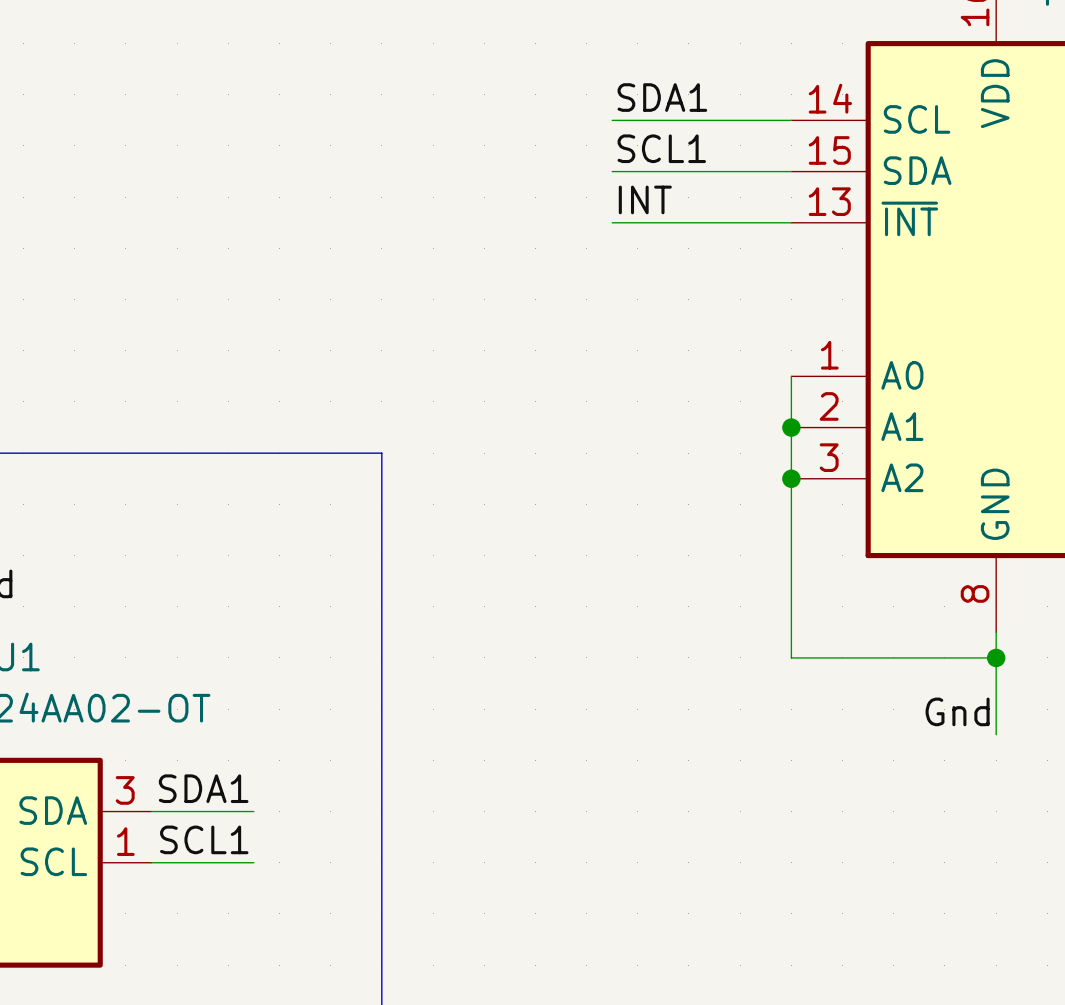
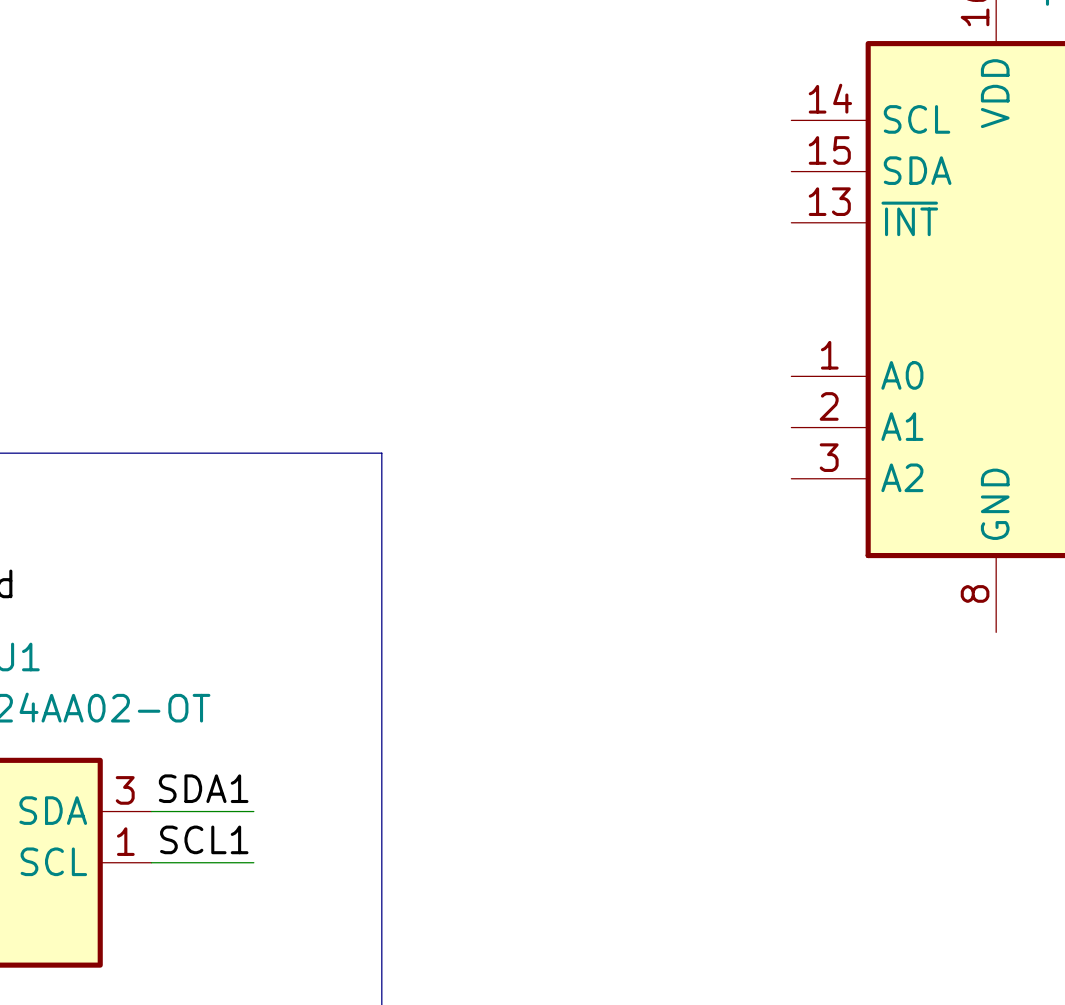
label: SDA1 (662, 97) -> none
wire: (612, 120) (791, 120) -> none
label: SCL1 (661, 148) -> none
wire: (612, 171) (791, 171) -> none
label: INT (645, 199) -> none
wire: (612, 222) (791, 222) -> none
wire: (791, 376) (791, 657) (996, 657) -> none
junction: (791, 427) -> none
junction: (791, 478) -> none
wire: (996, 632) (996, 734) -> none
junction: (996, 657) -> none
label: Gnd (957, 711) -> none

